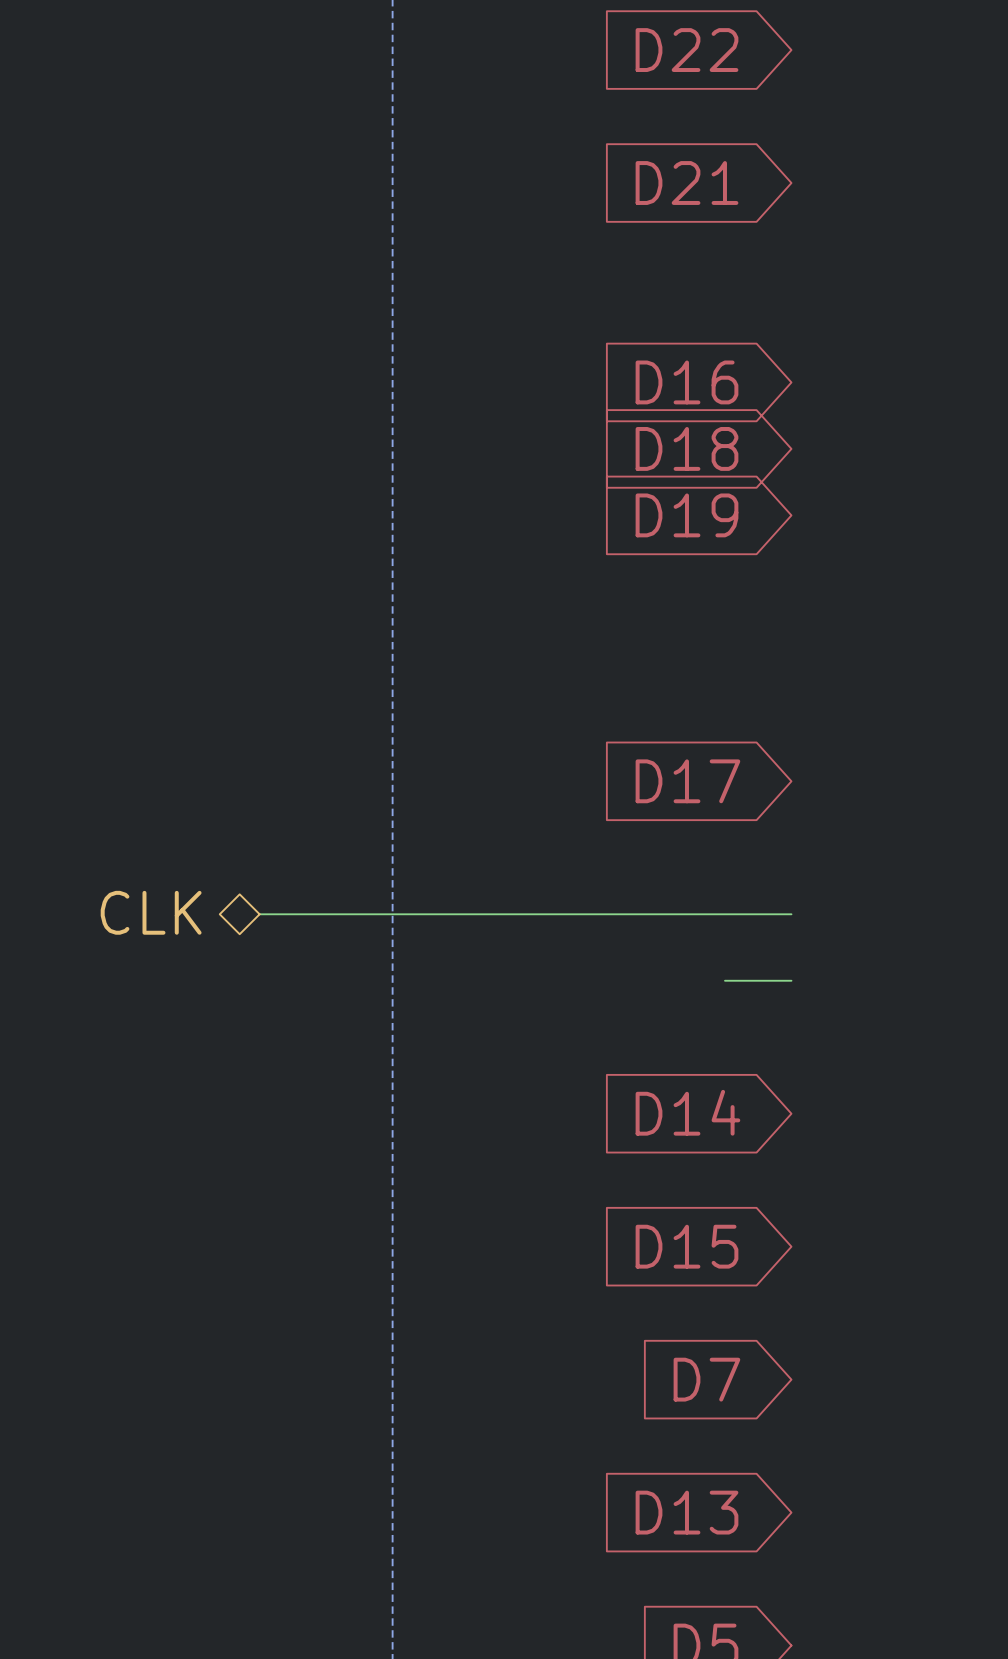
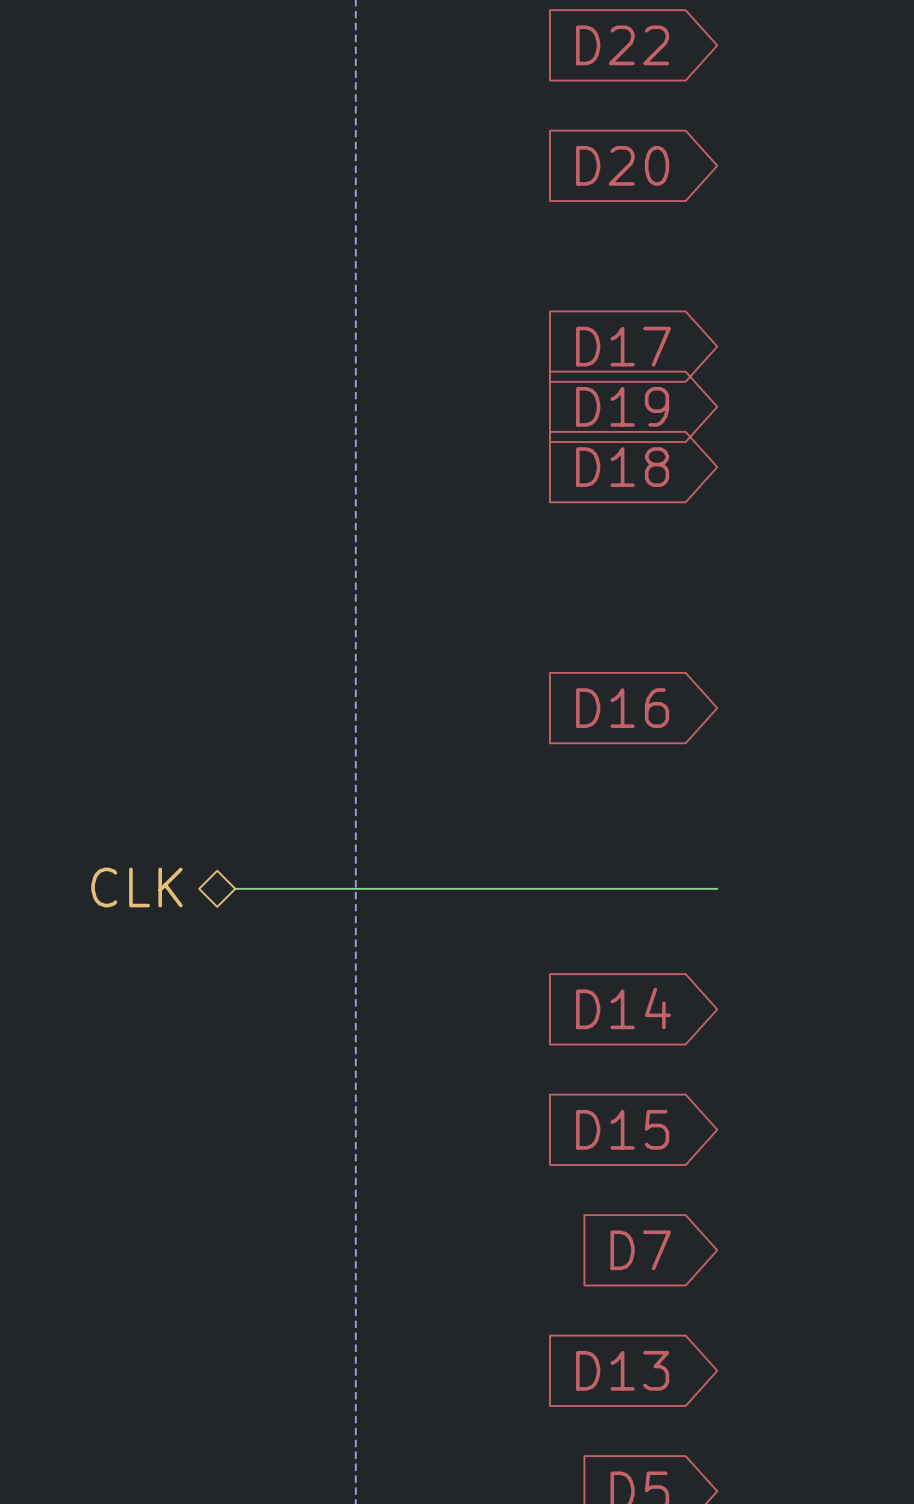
global label: D21 (686, 183) -> D20 (622, 165)
global label: D16 (686, 382) -> D17 (623, 346)
global label: D18 (686, 448) -> D19 (622, 406)
global label: D19 (686, 515) -> D18 (622, 467)
global label: D17 (687, 781) -> D16 (622, 708)
hierarchical label position: CLK (151, 912) -> CLK (136, 887)
wire: (259, 914) (791, 914) -> none
wire: none -> (235, 888) (657, 888)

